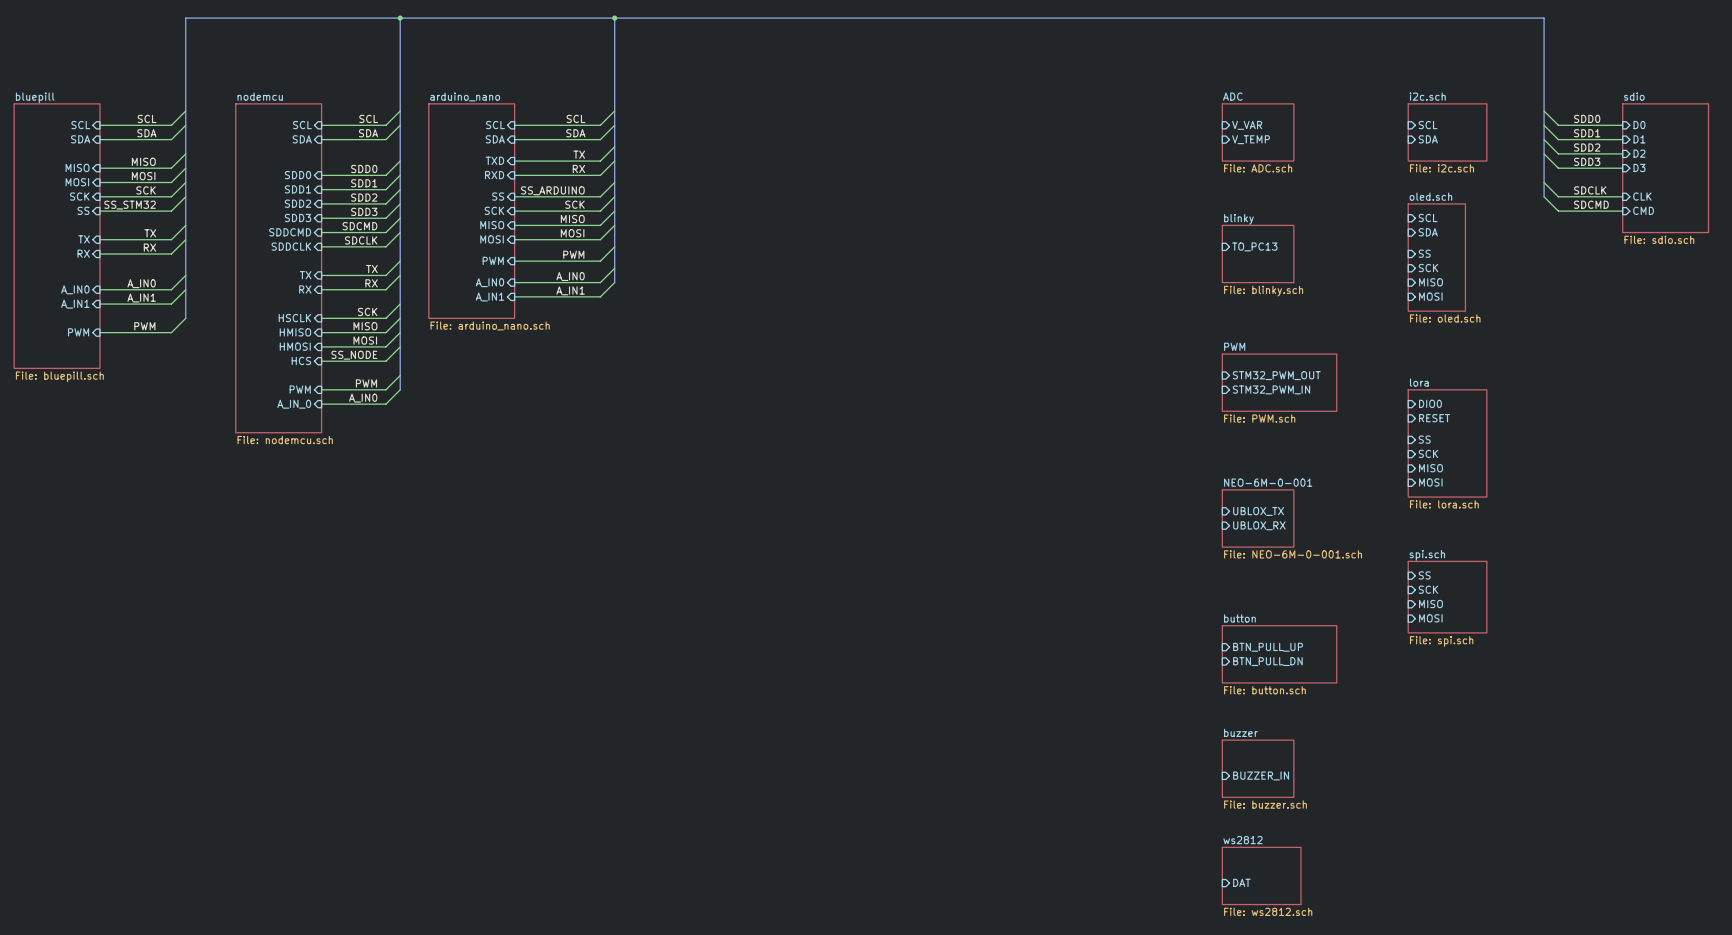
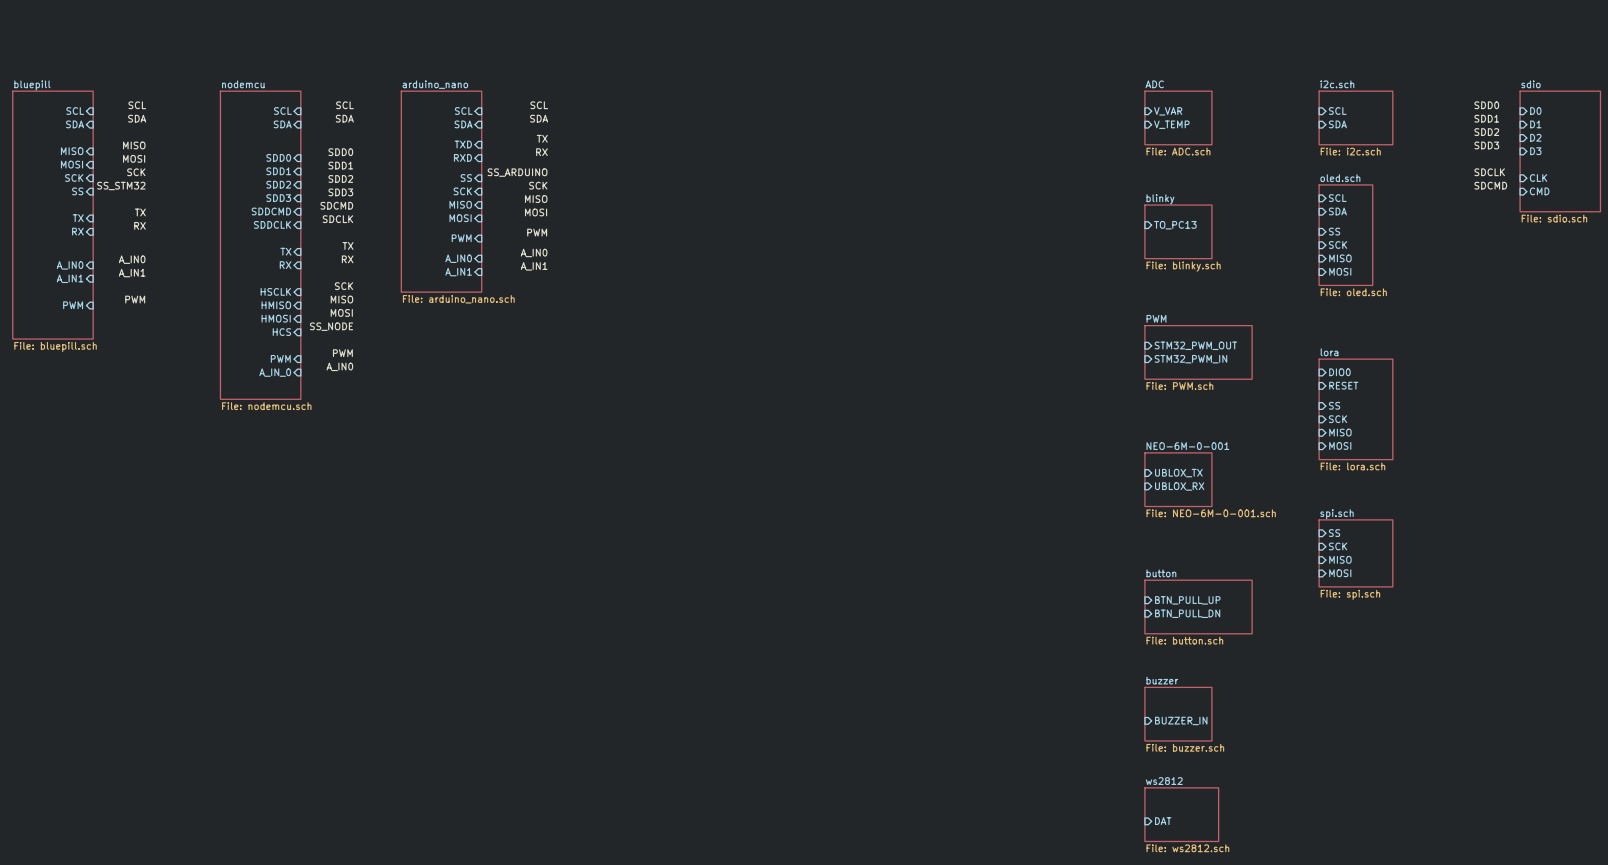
bus: (400, 18) (400, 389) -> none
junction: (400, 18) -> none
bus: (614, 18) (614, 282) -> none
junction: (614, 18) -> none
wire: (185, 111) (171, 125) (99, 125) -> none
wire: (400, 111) (385, 125) (321, 125) -> none
wire: (614, 111) (600, 125) (514, 125) -> none
wire: (1544, 111) (1558, 125) (1622, 125) -> none
wire: (185, 125) (171, 139) (99, 139) -> none
wire: (400, 125) (385, 139) (321, 139) -> none
wire: (614, 125) (600, 139) (514, 139) -> none
wire: (1544, 125) (1558, 139) (1622, 139) -> none
wire: (1544, 139) (1558, 153) (1622, 153) -> none
wire: (614, 146) (600, 161) (514, 161) -> none
wire: (185, 153) (171, 168) (99, 168) -> none
wire: (1544, 153) (1558, 168) (1622, 168) -> none
wire: (400, 161) (385, 175) (321, 175) -> none
wire: (614, 161) (600, 175) (514, 175) -> none
wire: (185, 168) (171, 182) (99, 182) -> none
wire: (400, 175) (385, 189) (321, 189) -> none
wire: (185, 182) (171, 196) (99, 196) -> none
wire: (614, 182) (600, 196) (514, 196) -> none
wire: (1544, 182) (1558, 196) (1622, 196) -> none
wire: (400, 189) (385, 203) (321, 203) -> none
wire: (185, 196) (171, 211) (99, 211) -> none
wire: (614, 196) (600, 211) (514, 211) -> none
wire: (1544, 196) (1558, 211) (1622, 211) -> none
bus: (1544, 196) (1544, 18) (185, 18) (185, 318) -> none
wire: (400, 203) (385, 218) (321, 218) -> none
wire: (614, 211) (600, 225) (514, 225) -> none
wire: (400, 218) (385, 232) (321, 232) -> none
wire: (185, 225) (171, 239) (99, 239) -> none
wire: (614, 225) (600, 239) (514, 239) -> none
wire: (400, 232) (385, 246) (321, 246) -> none
wire: (185, 239) (171, 253) (99, 253) -> none
wire: (614, 246) (600, 261) (514, 261) -> none
wire: (400, 261) (385, 275) (321, 275) -> none
wire: (614, 268) (600, 282) (514, 282) -> none
wire: (185, 275) (171, 289) (99, 289) -> none
wire: (400, 275) (385, 289) (321, 289) -> none
wire: (614, 282) (600, 296) (514, 296) -> none
wire: (185, 289) (171, 304) (99, 304) -> none
wire: (400, 304) (385, 318) (321, 318) -> none
wire: (185, 318) (171, 332) (99, 332) -> none
wire: (400, 318) (385, 332) (321, 332) -> none
wire: (400, 332) (385, 346) (321, 346) -> none
wire: (400, 346) (385, 361) (321, 361) -> none
wire: (400, 375) (385, 389) (321, 389) -> none
wire: (400, 389) (385, 404) (321, 404) -> none

